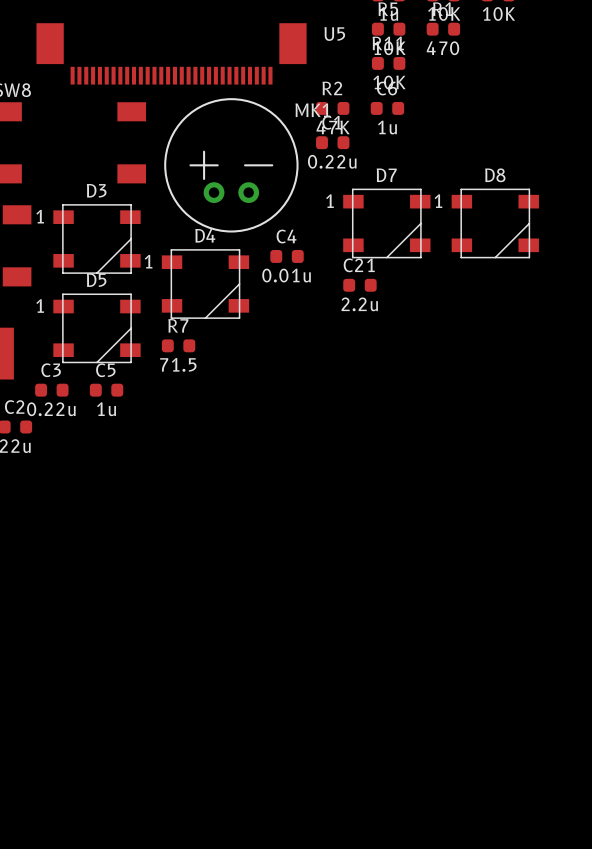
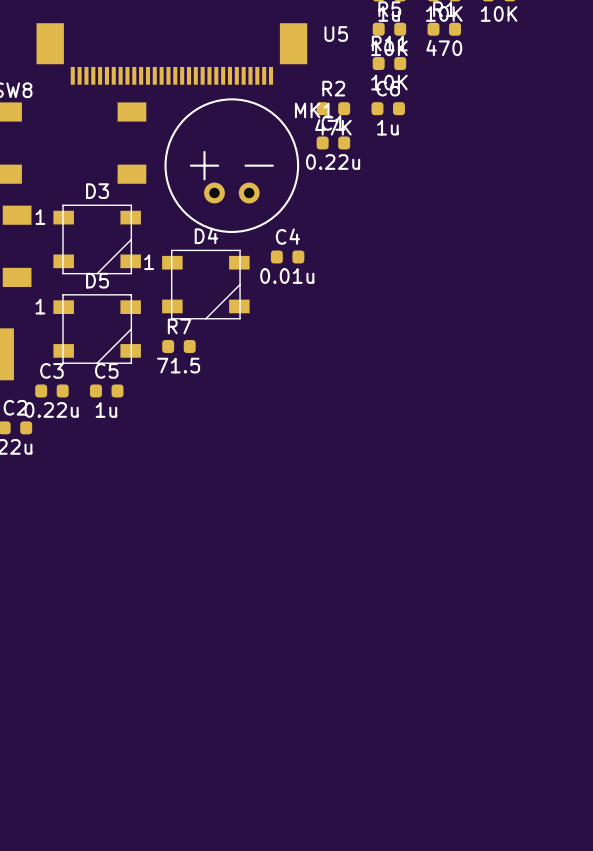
D7: (386, 223) -> none
D8: (495, 223) -> none
C21: 2.2u (359, 285) -> none

